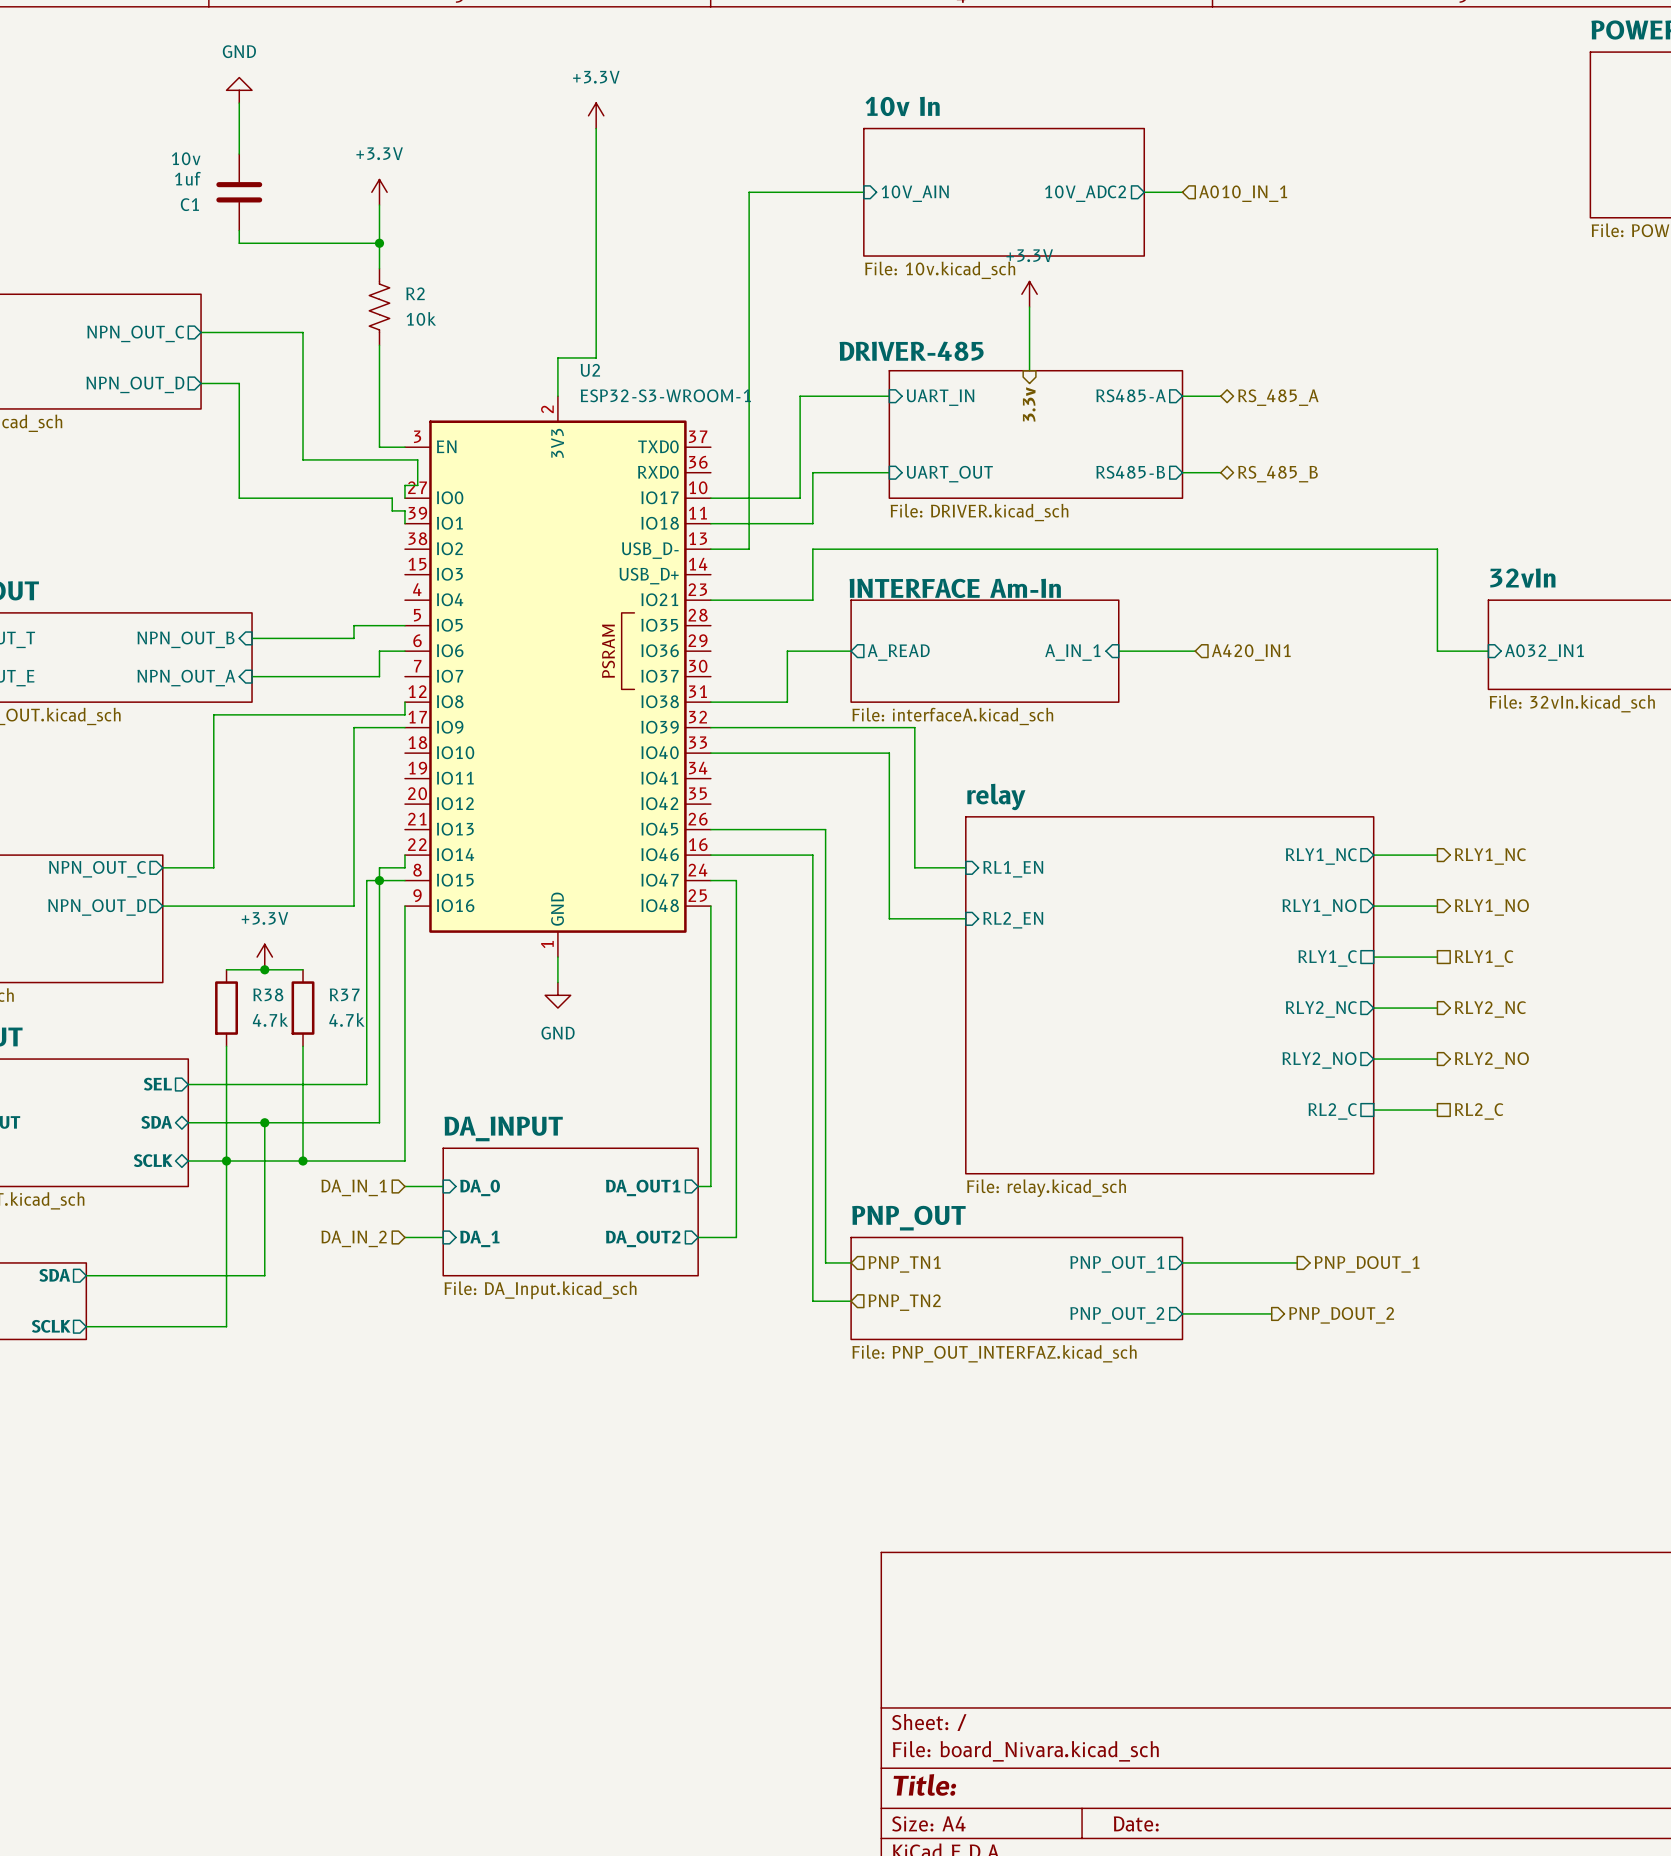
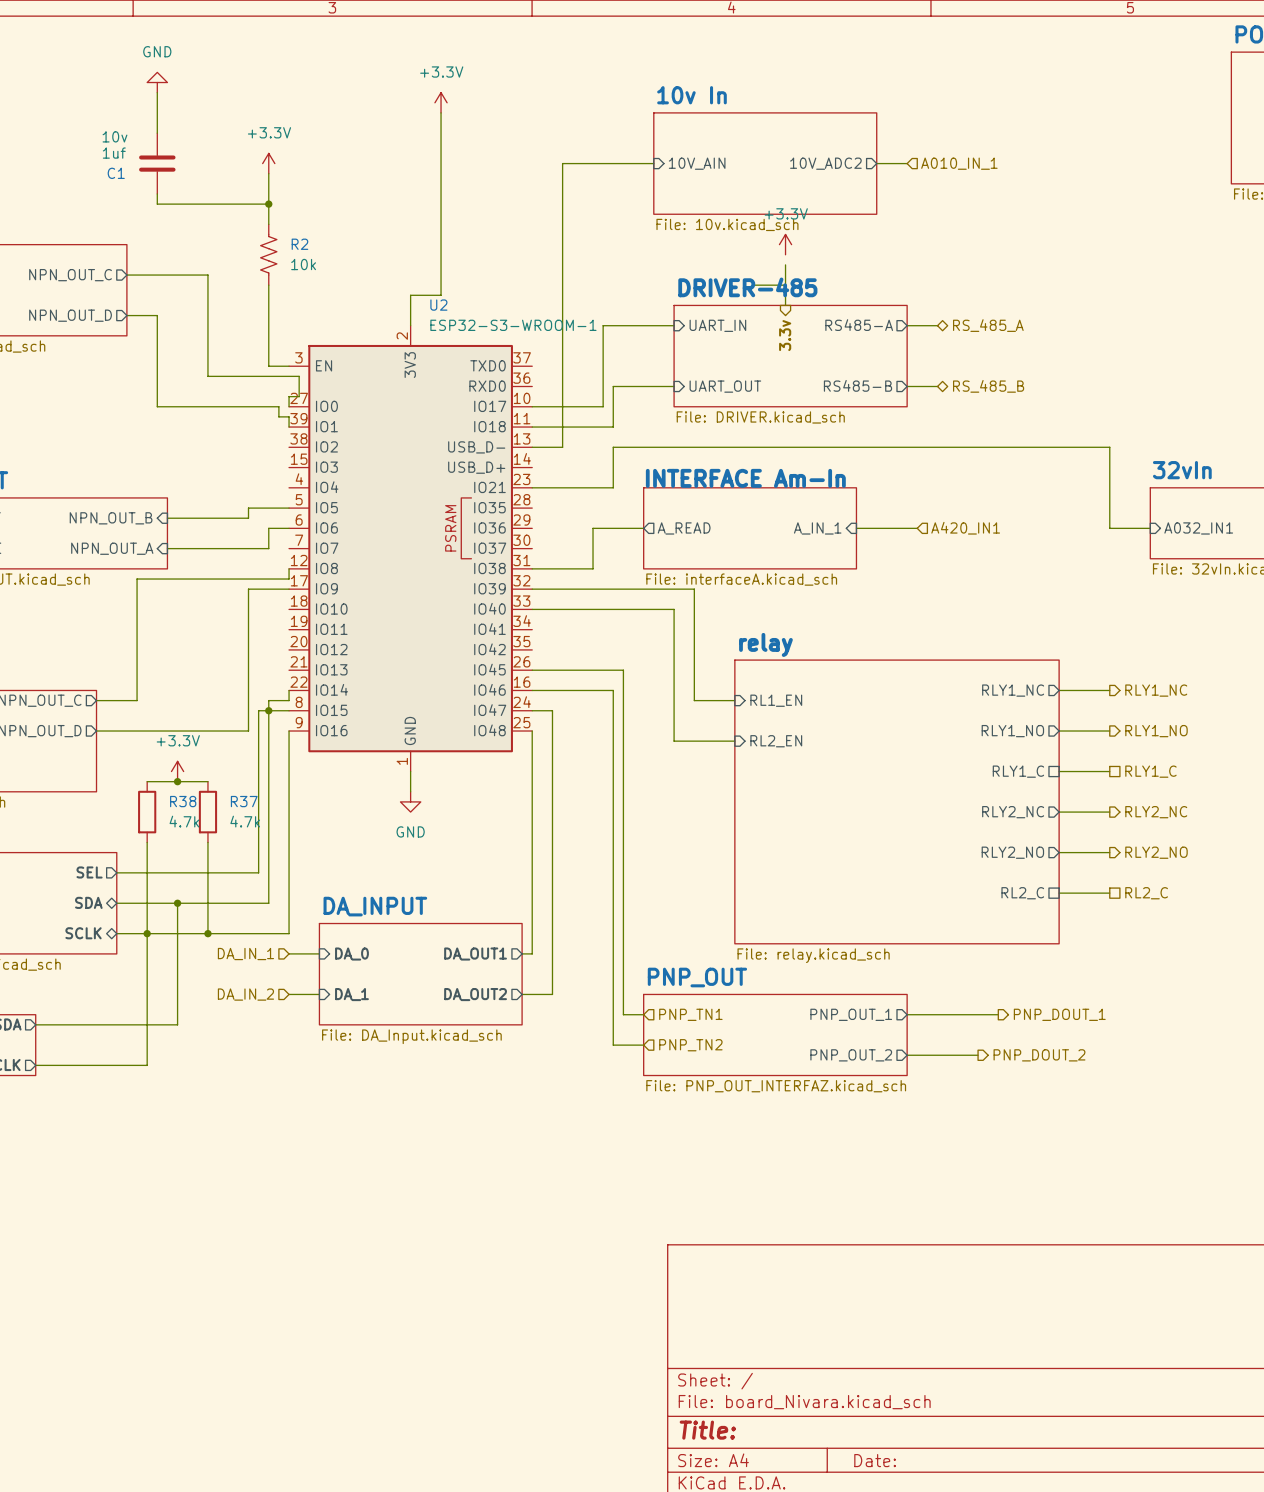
wire: (1029, 307) (1029, 319) -> none
wire: none -> (755, 285) (785, 285)
sheet DRIVER-485 name position: DRIVER-485 (911, 351) -> DRIVER-485 (747, 287)

